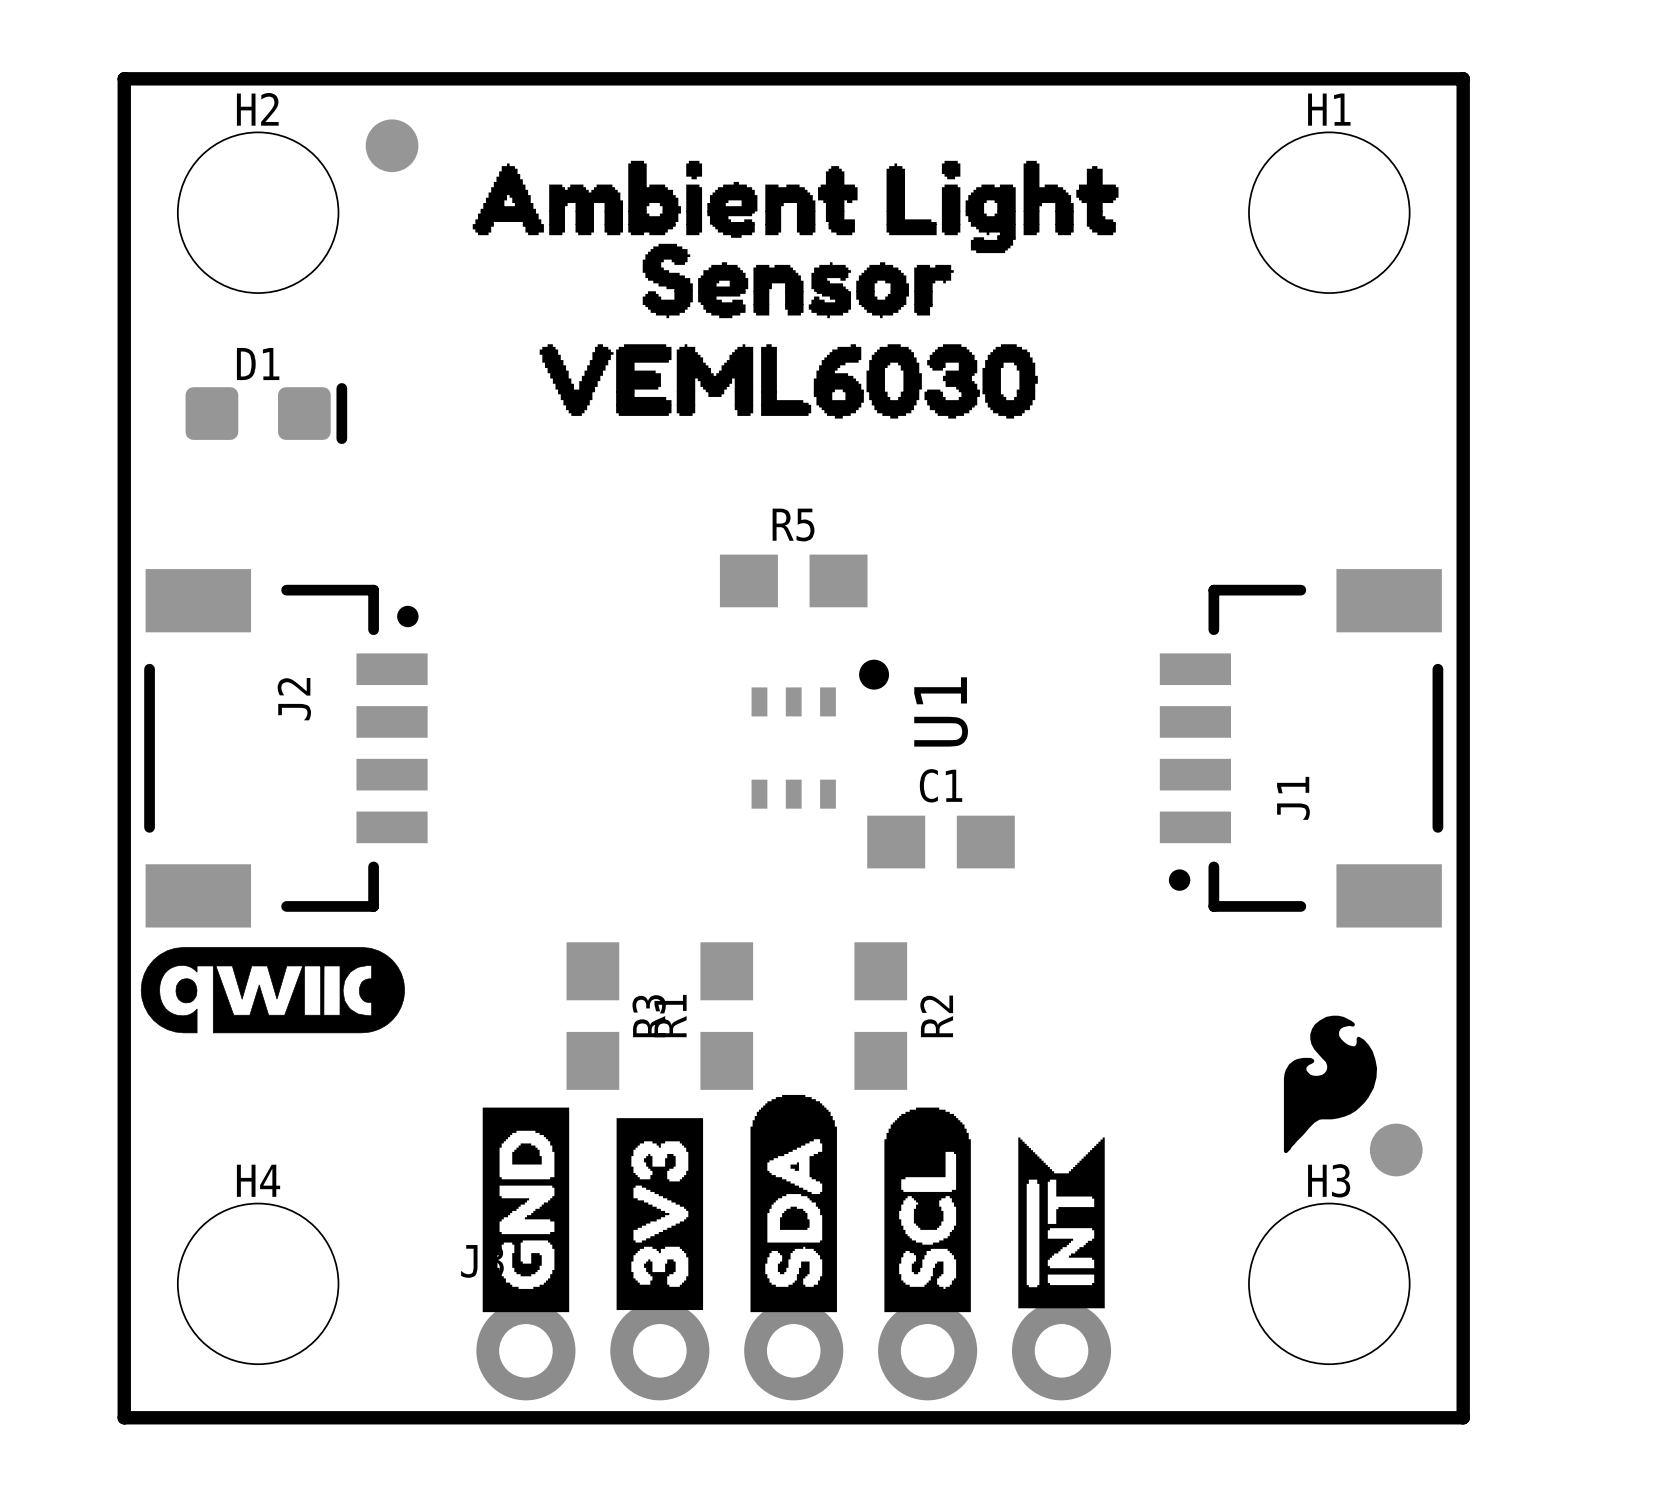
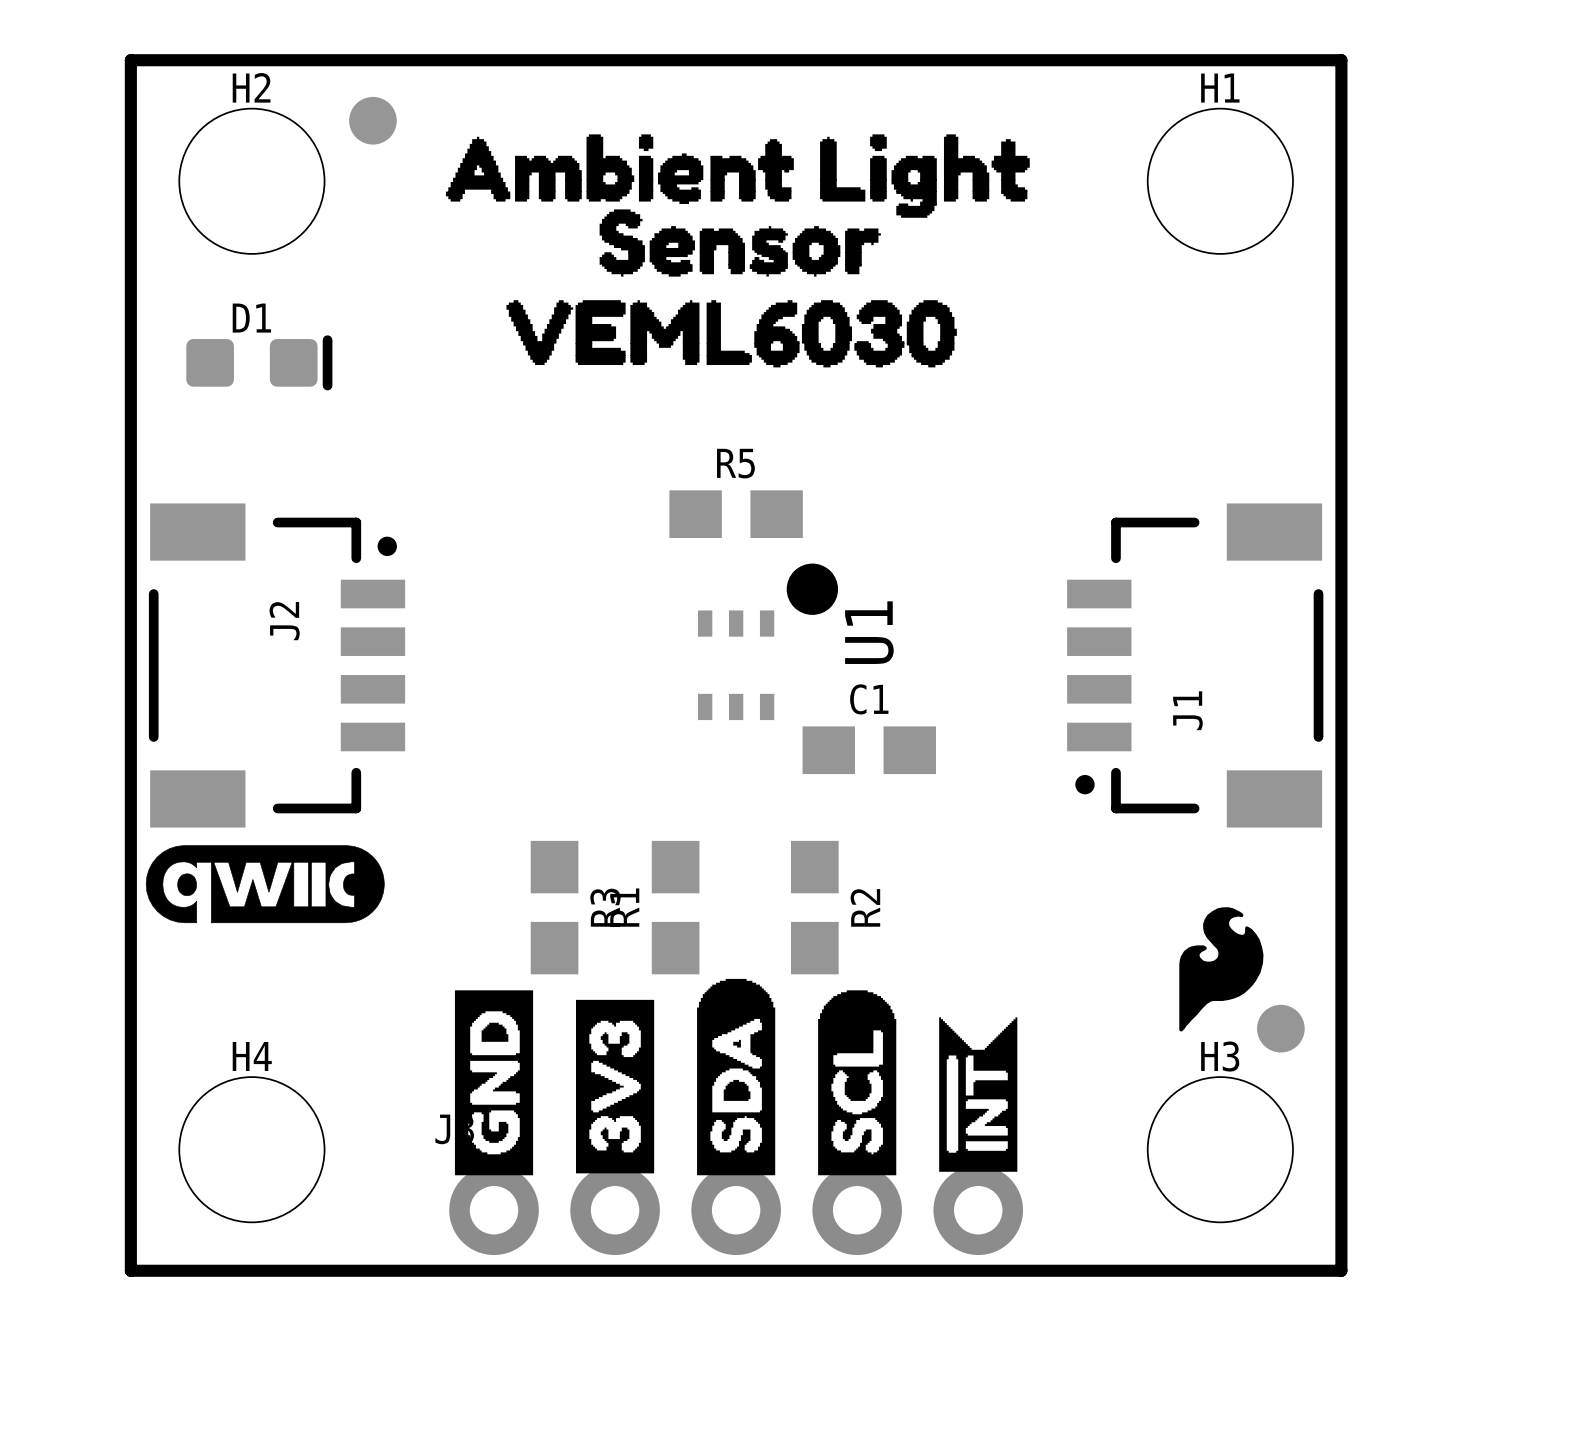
U1 footprint: [751, 659, 890, 809] -> [698, 563, 839, 721]

